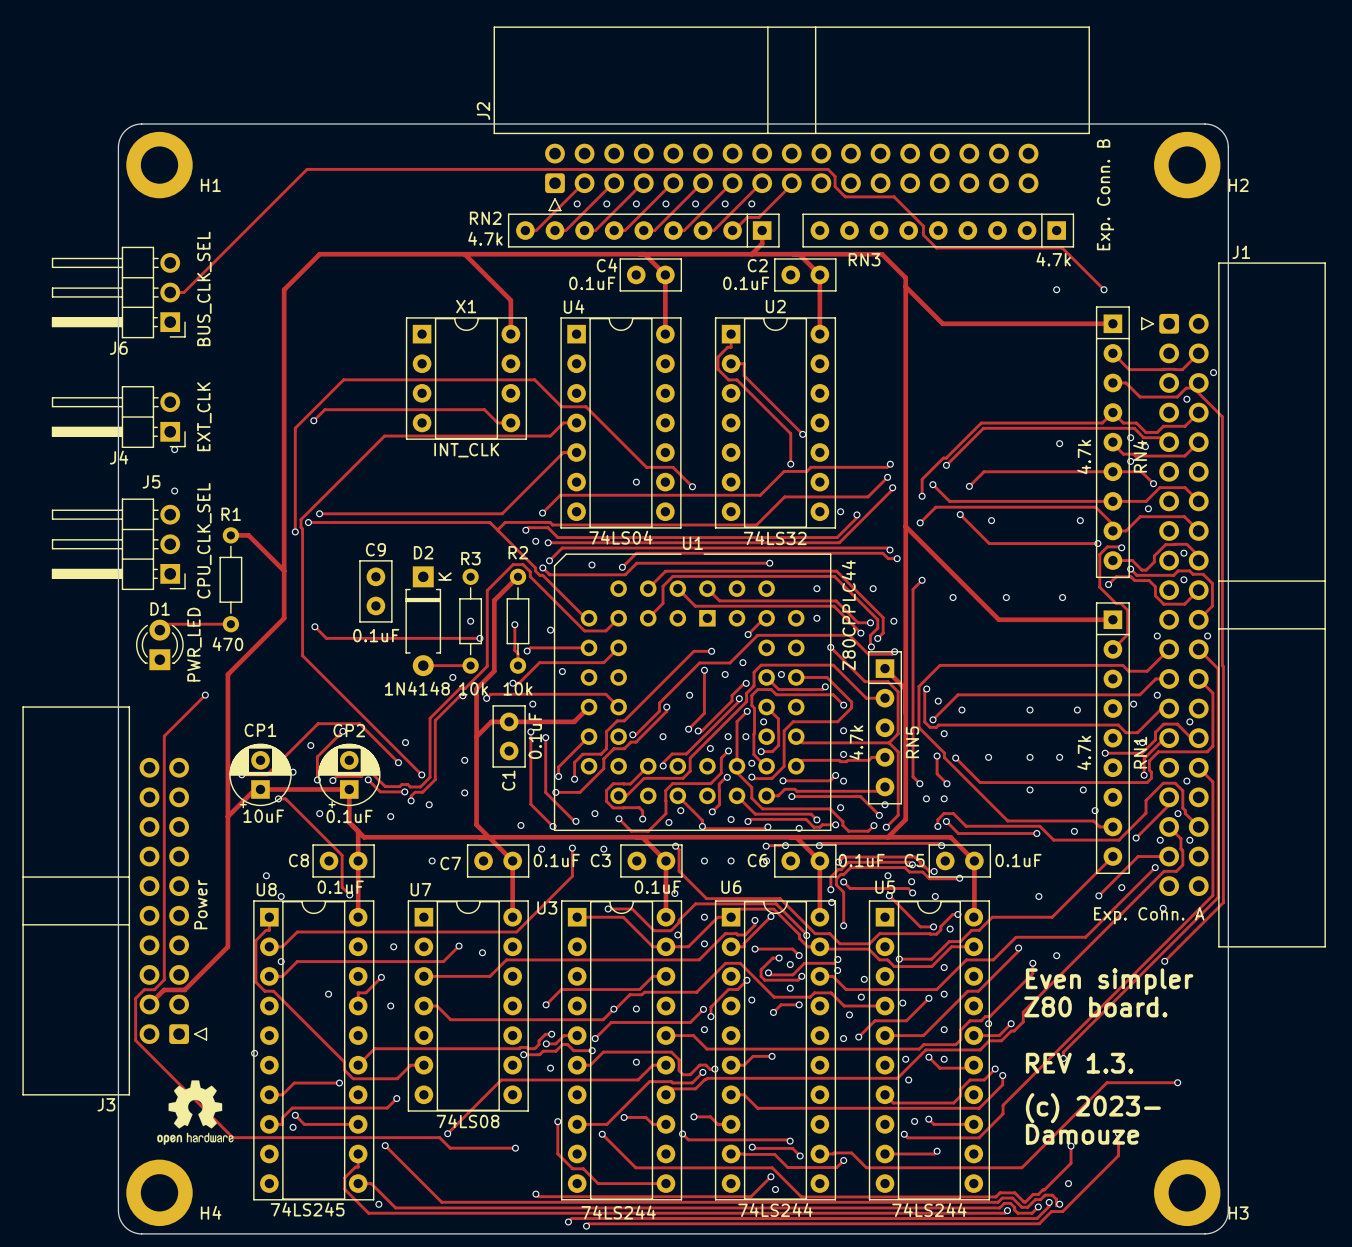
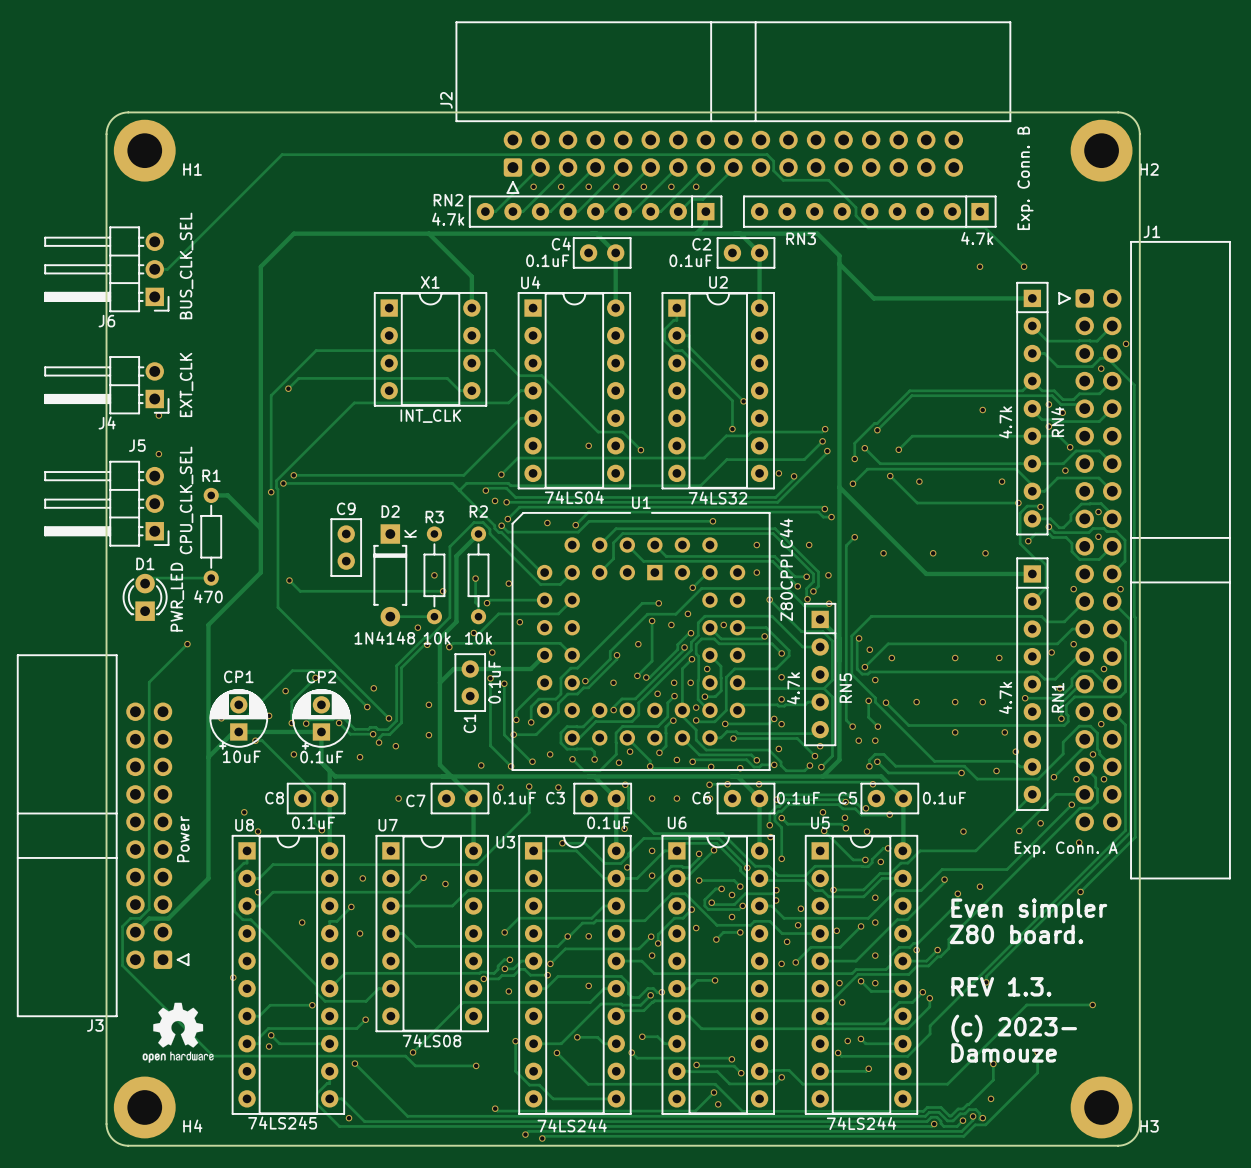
C9 value: 0.1uF (376, 635) -> none
U6 value: 74LS244 (775, 1210) -> none

